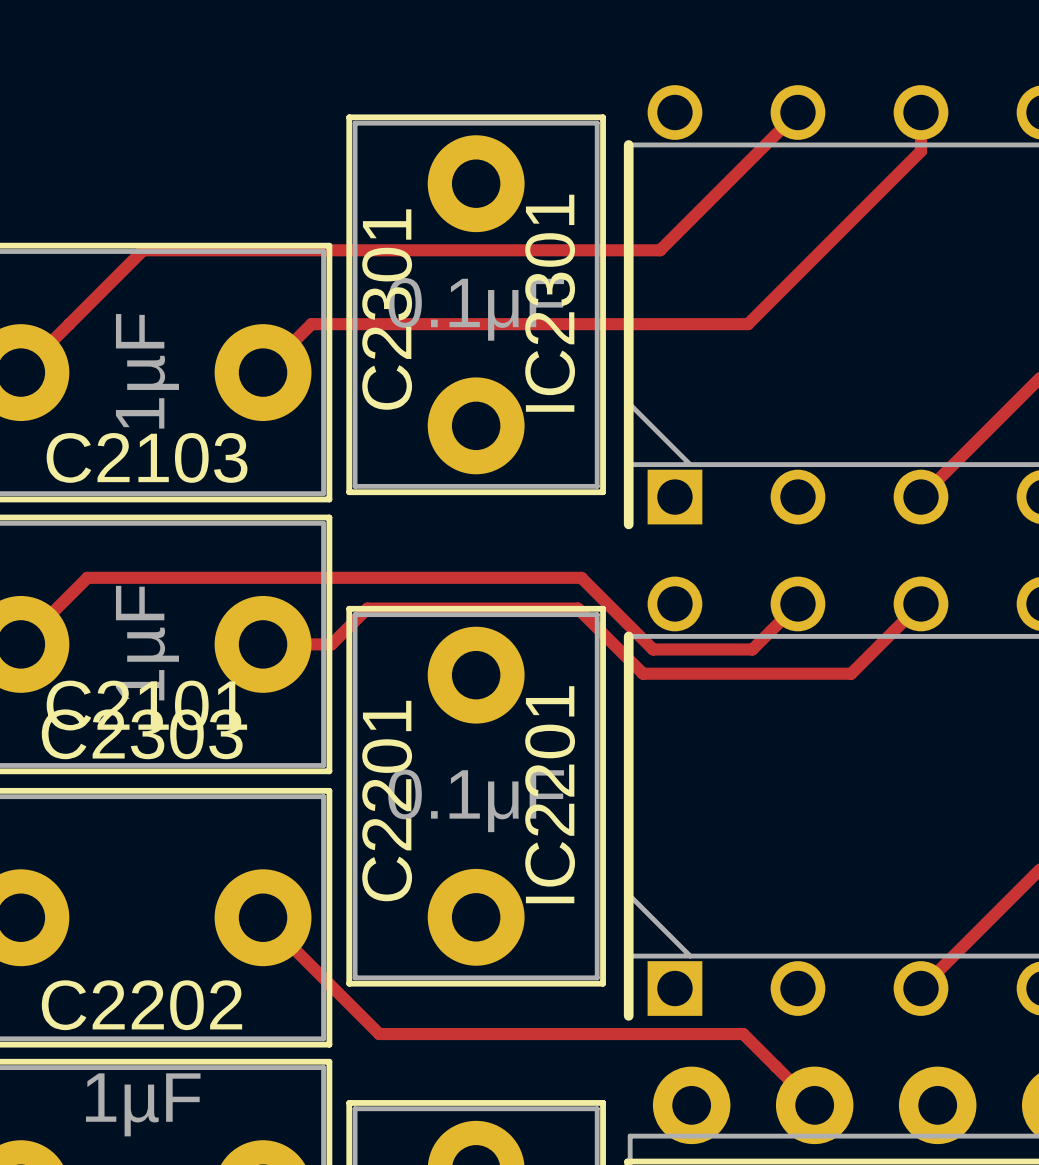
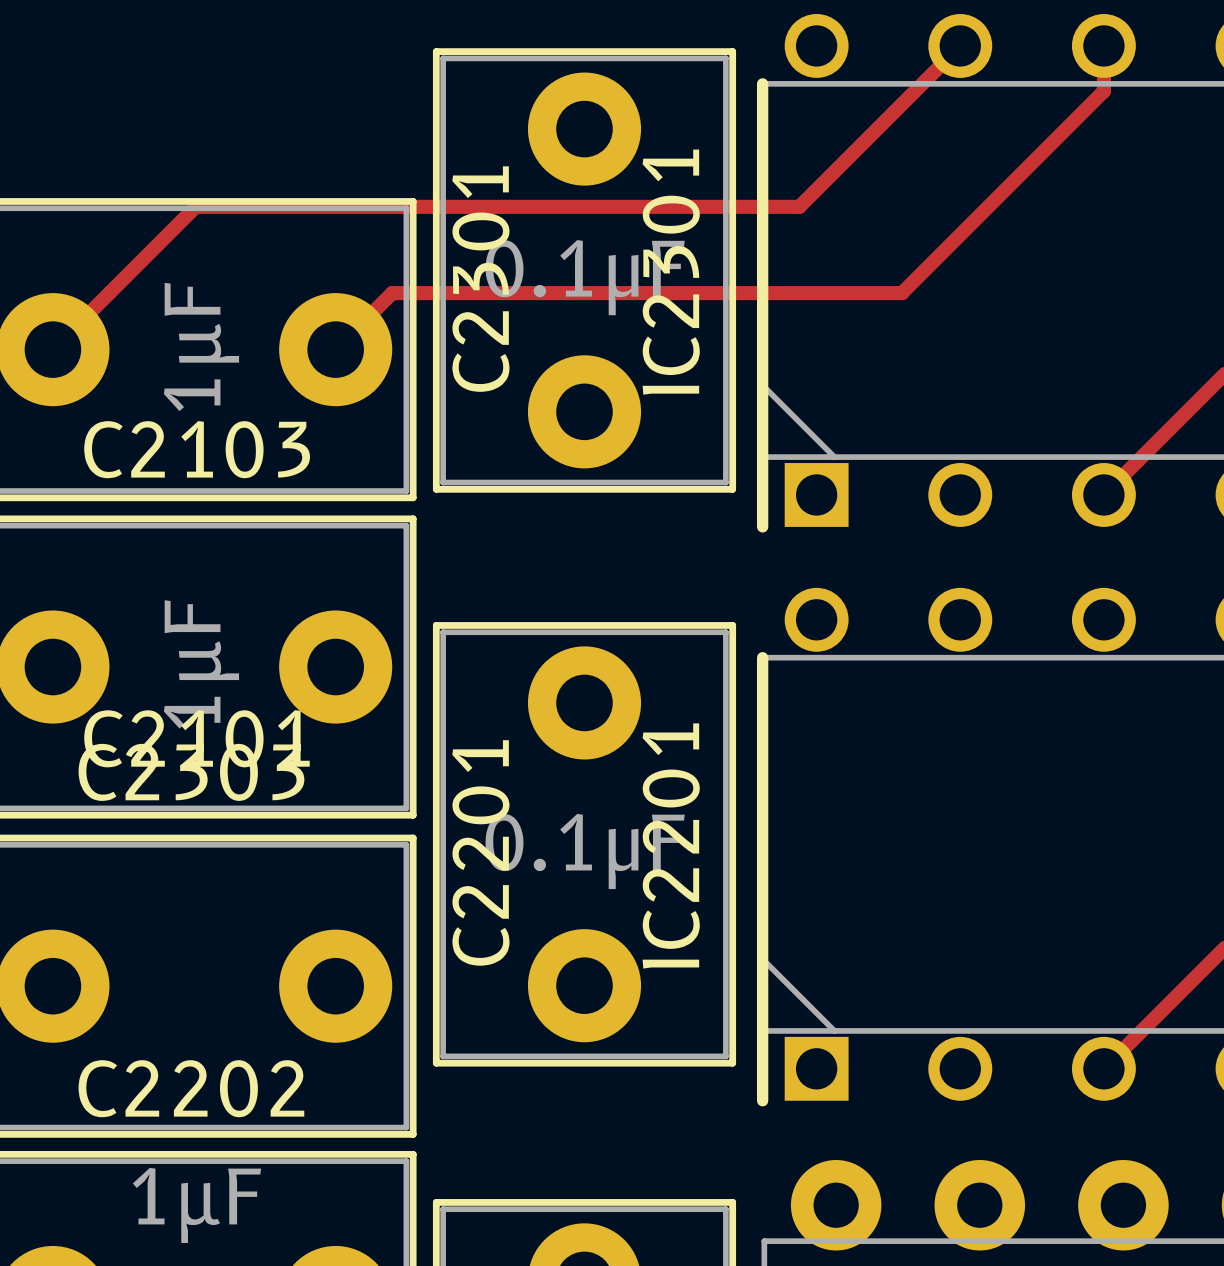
track: (797, 603) (752, 649) (653, 649) (581, 577) (87, 577) (20, 644) -> none
track: (921, 603) (851, 673) (643, 673) (577, 608) (367, 608) (331, 644) (263, 644) -> none
track: (263, 917) (379, 1034) (743, 1034) (814, 1105) -> none

